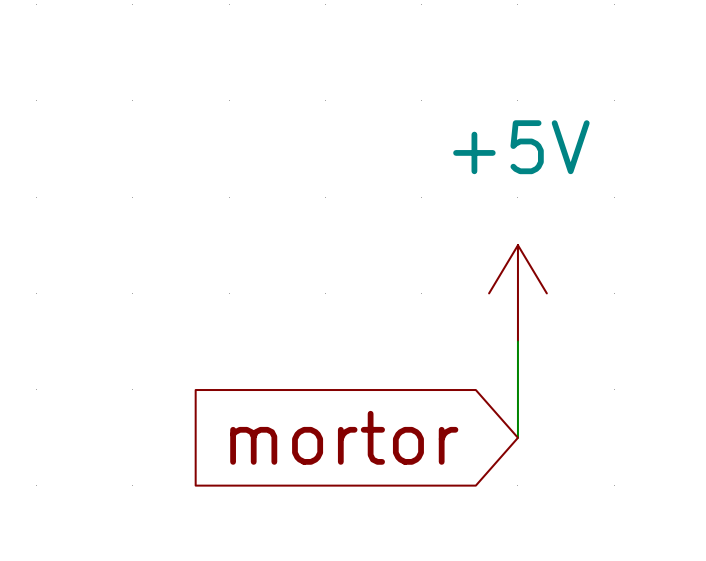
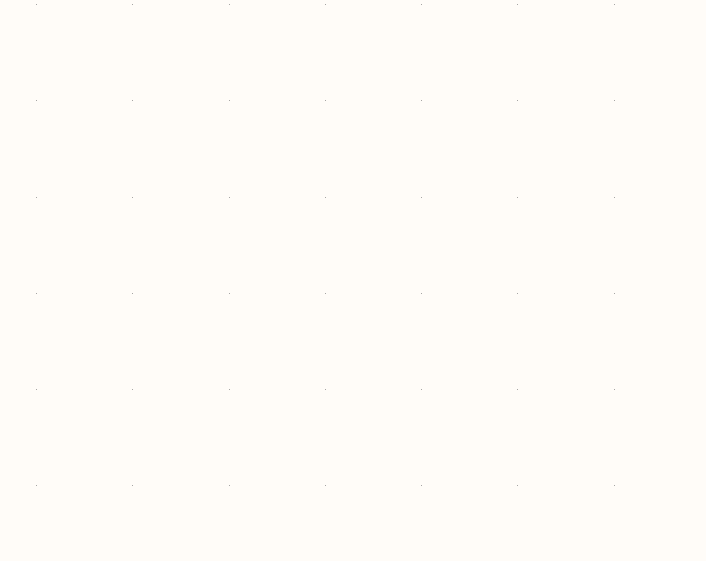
power symbol: +5V (517, 293) -> none
wire: (517, 341) (517, 437) -> none
global label: mortor (344, 437) -> none

